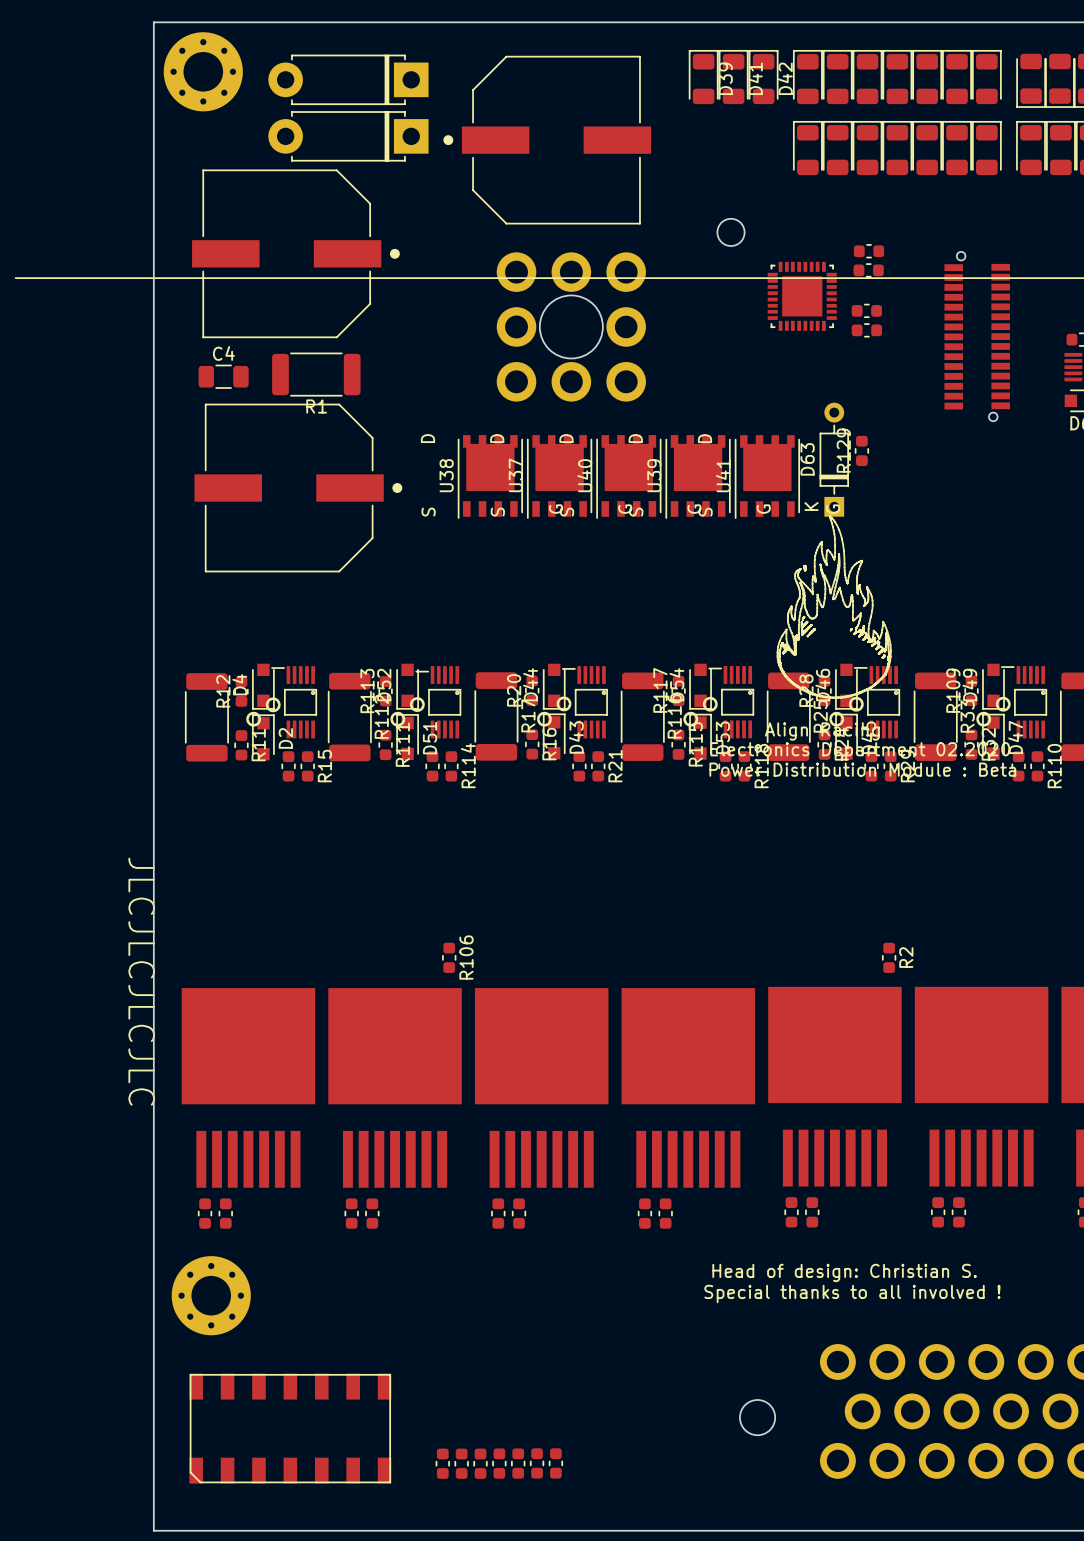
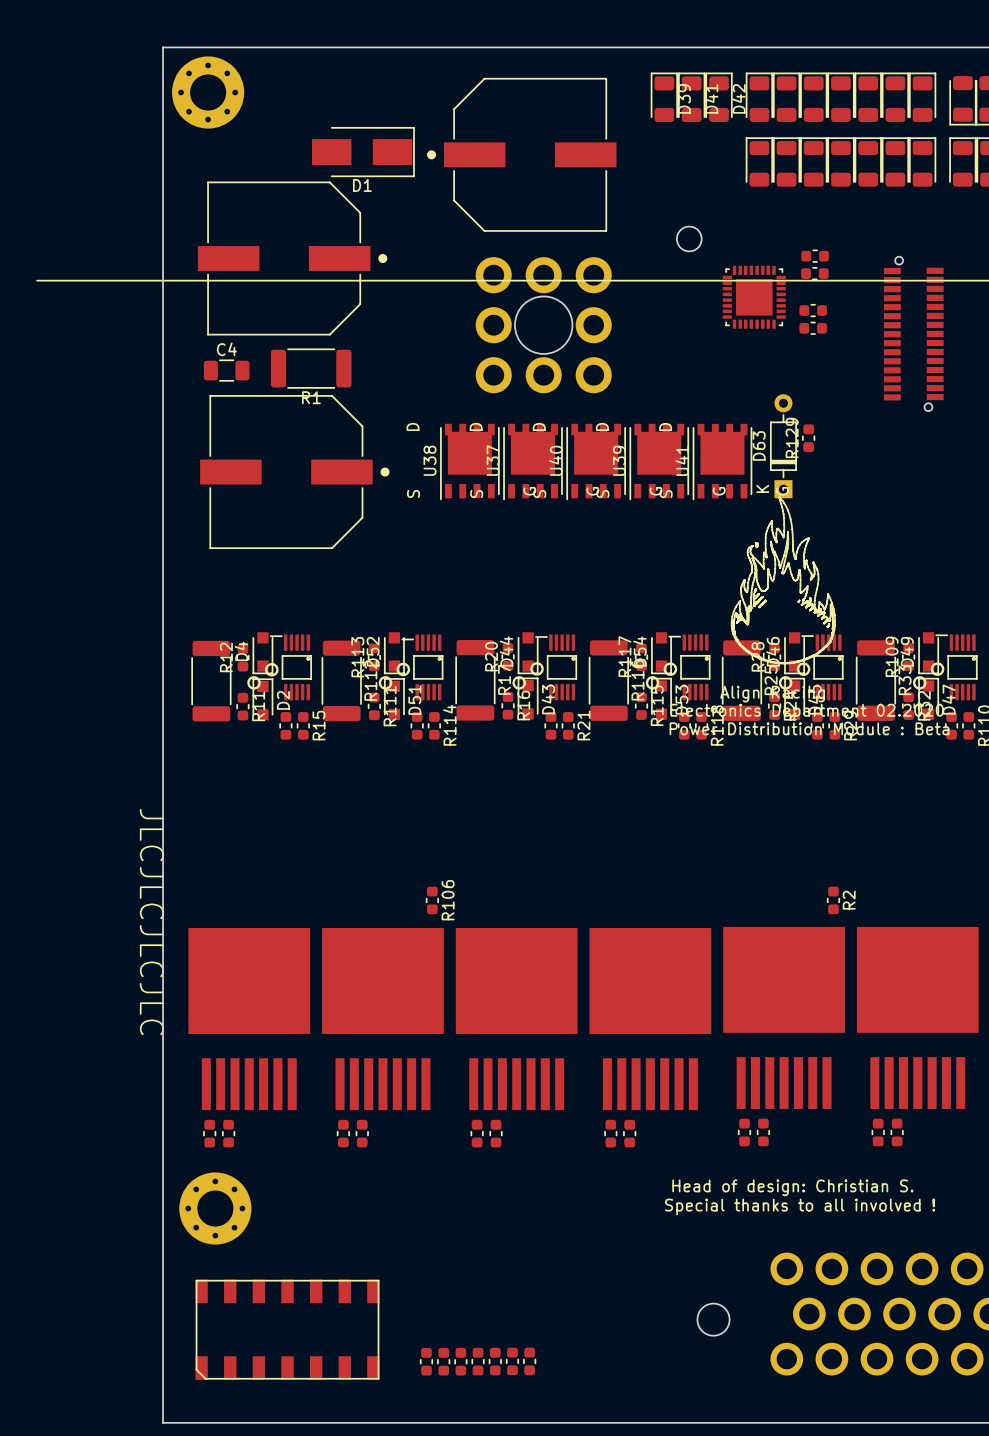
part: (348, 79) -> none
part: (348, 136) -> none
D1: none -> (363, 152)

